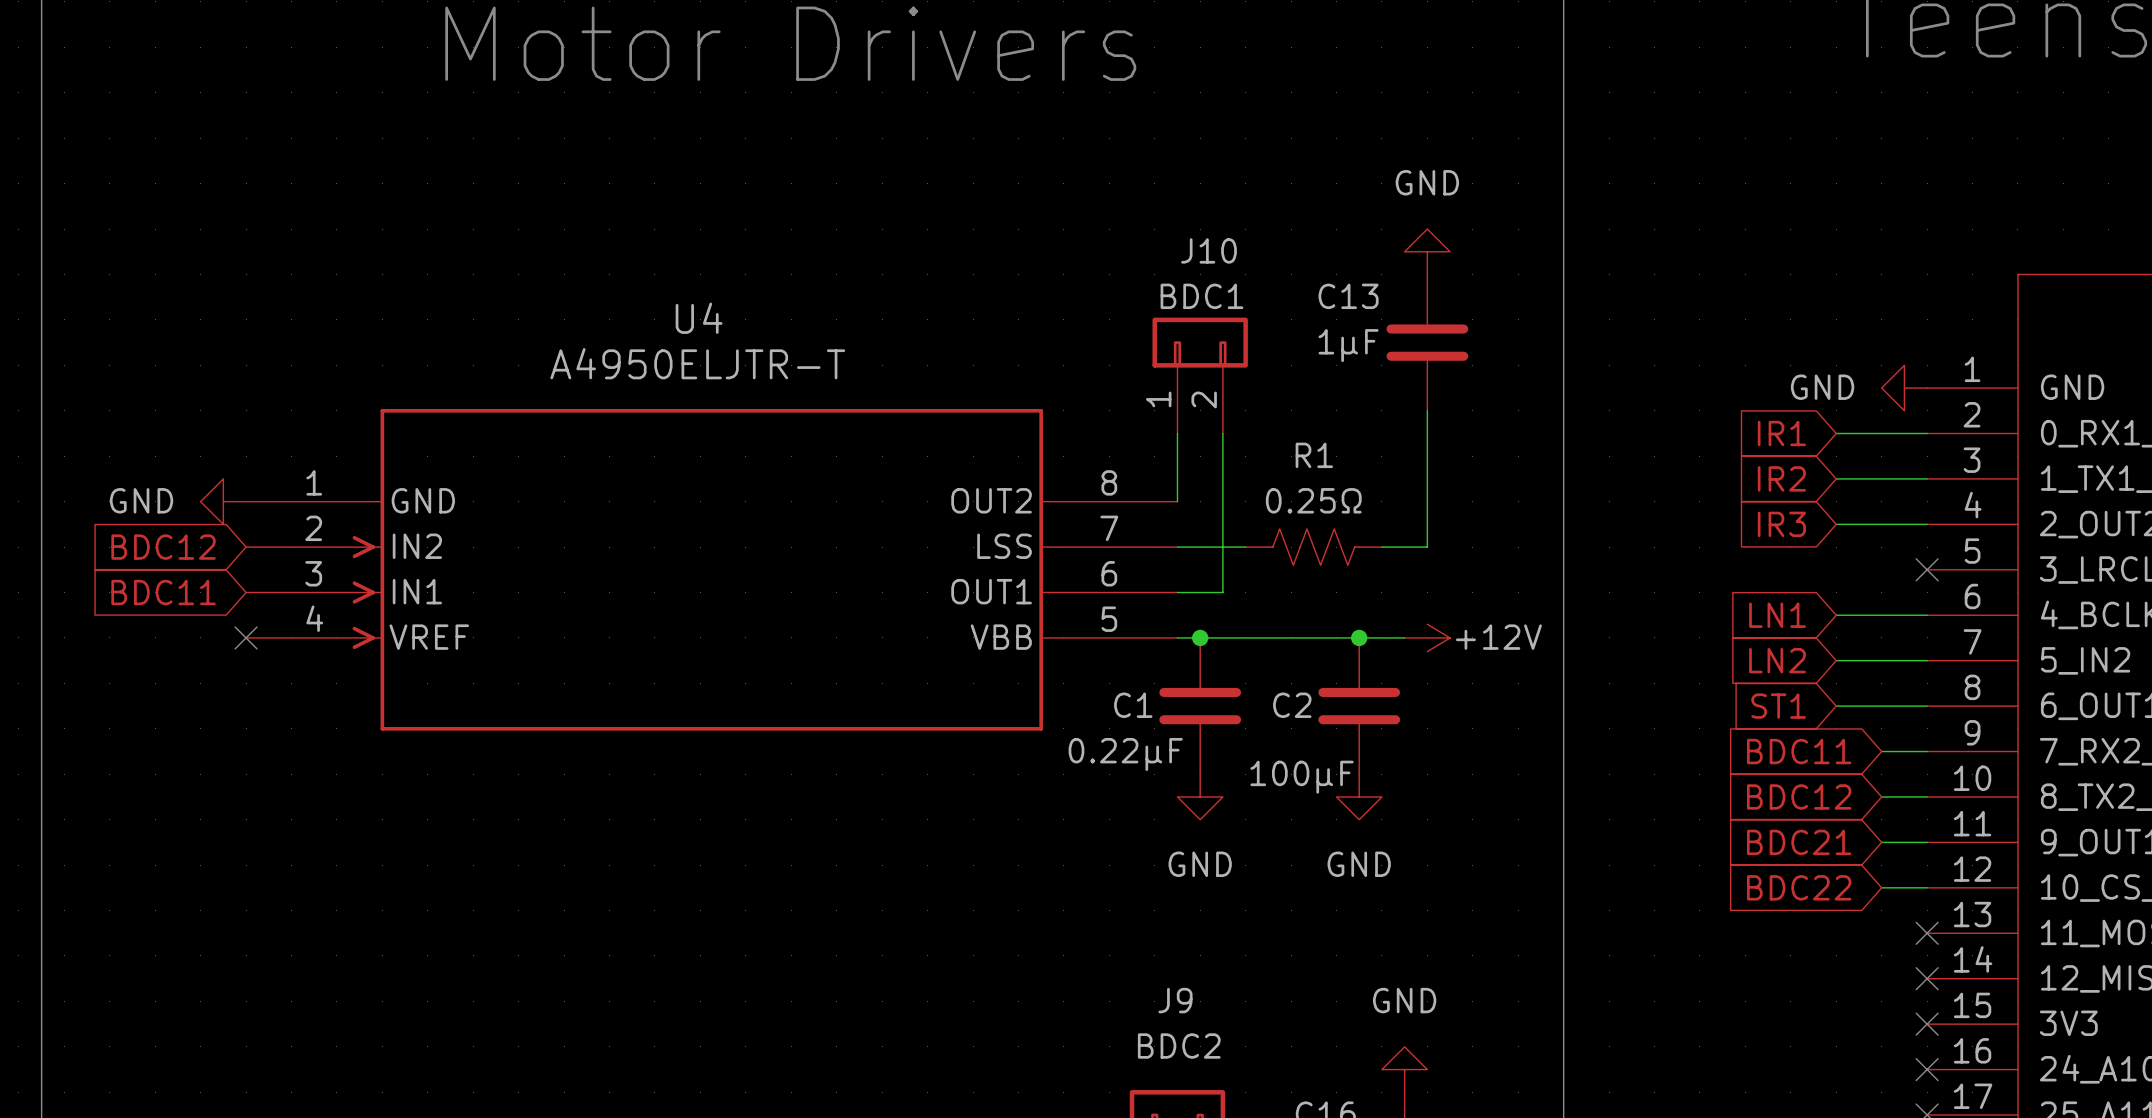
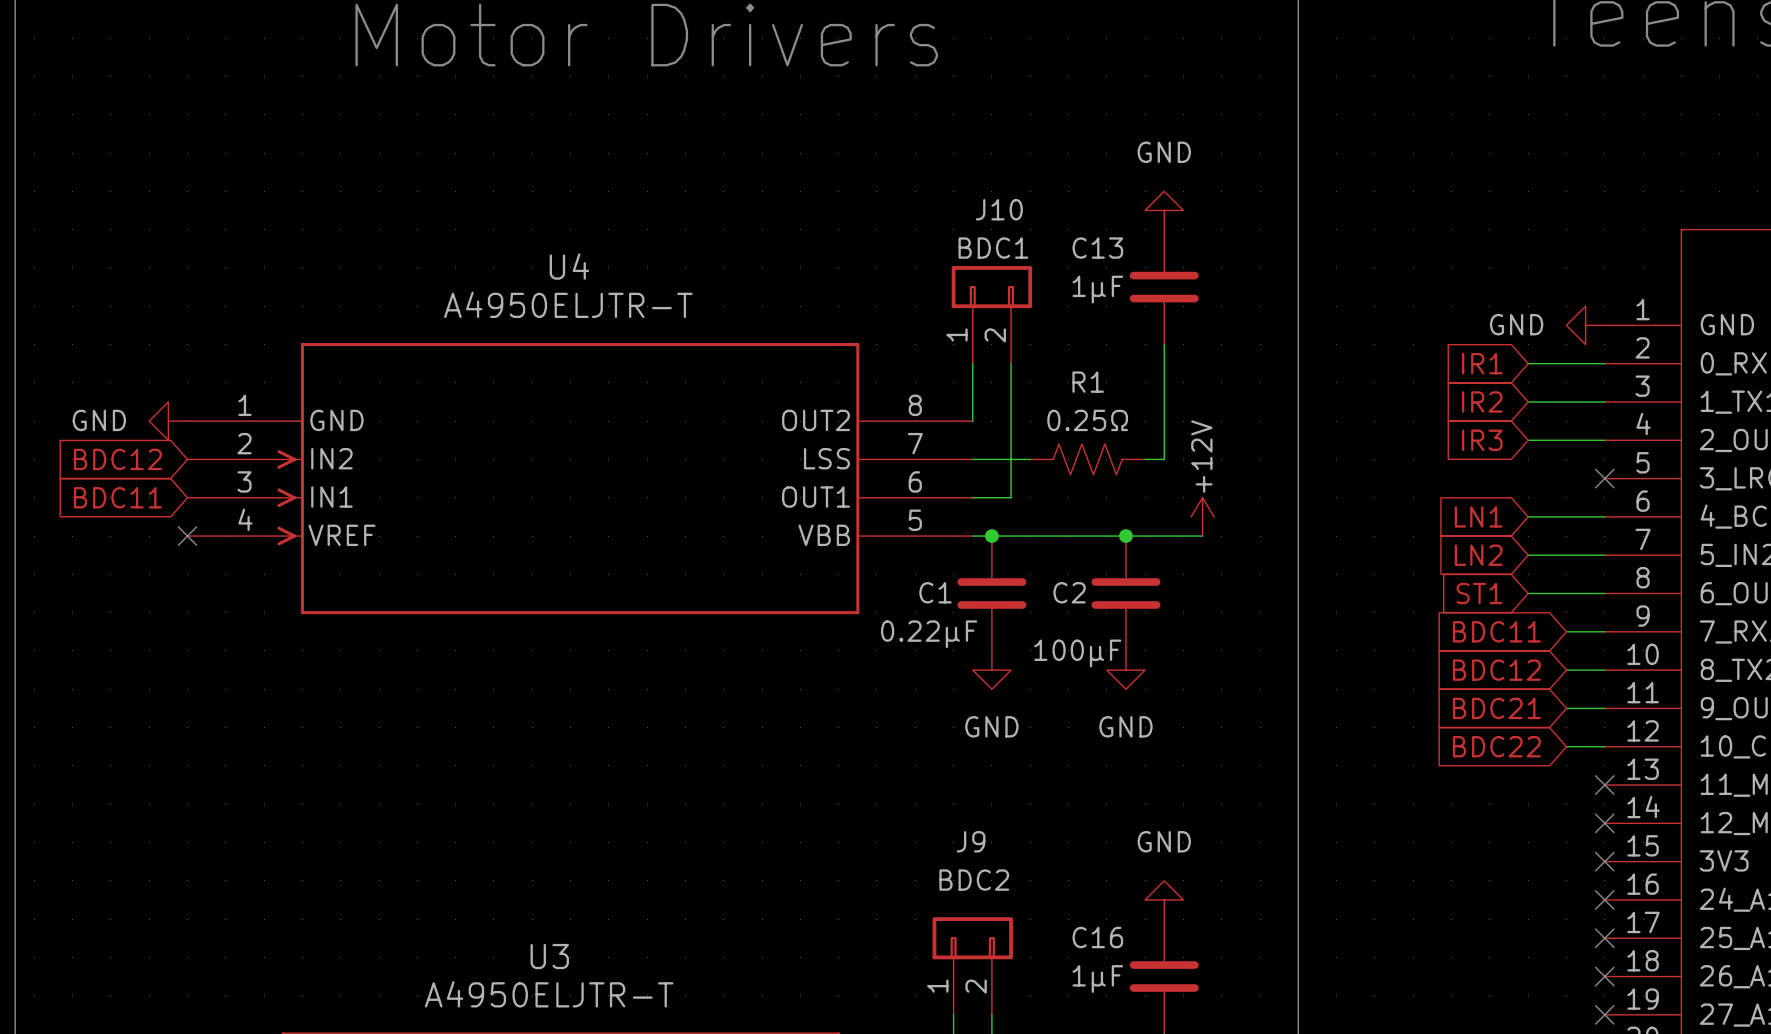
power symbol position: GND (1427, 251) -> GND (1164, 210)
C13 position: (1427, 342) -> (1164, 287)
wire: (1427, 410) (1427, 547) (1404, 547) -> (1164, 344) (1164, 459)
power symbol rotation: 0° (1427, 637) -> 90° counterclockwise (1202, 516)
power symbol position: +12V (1427, 637) -> +12V (1202, 516)

